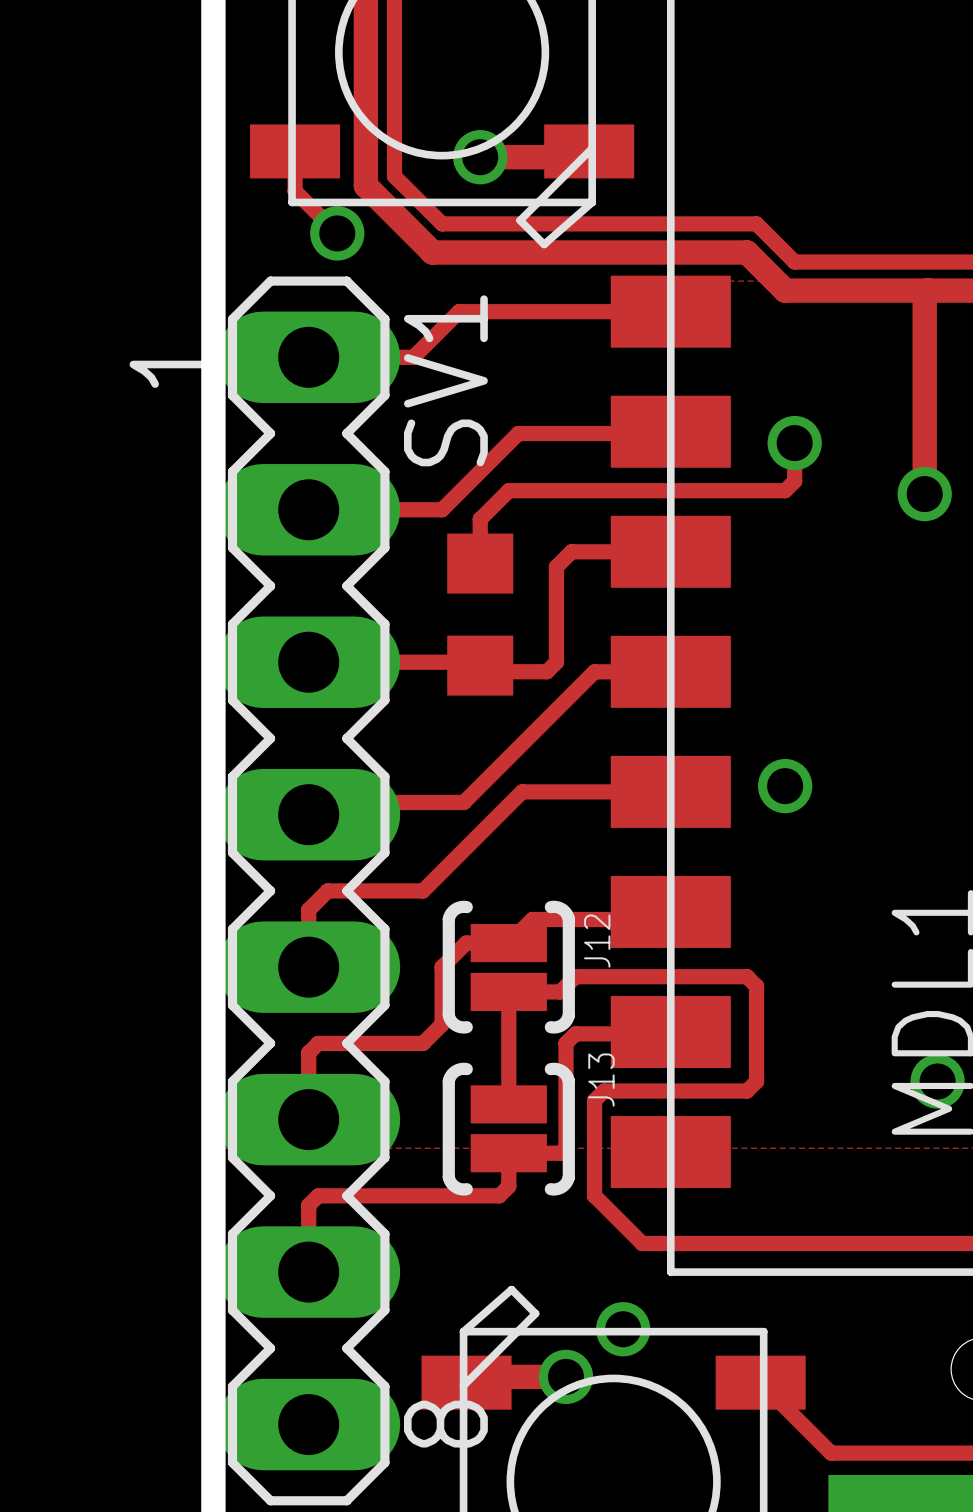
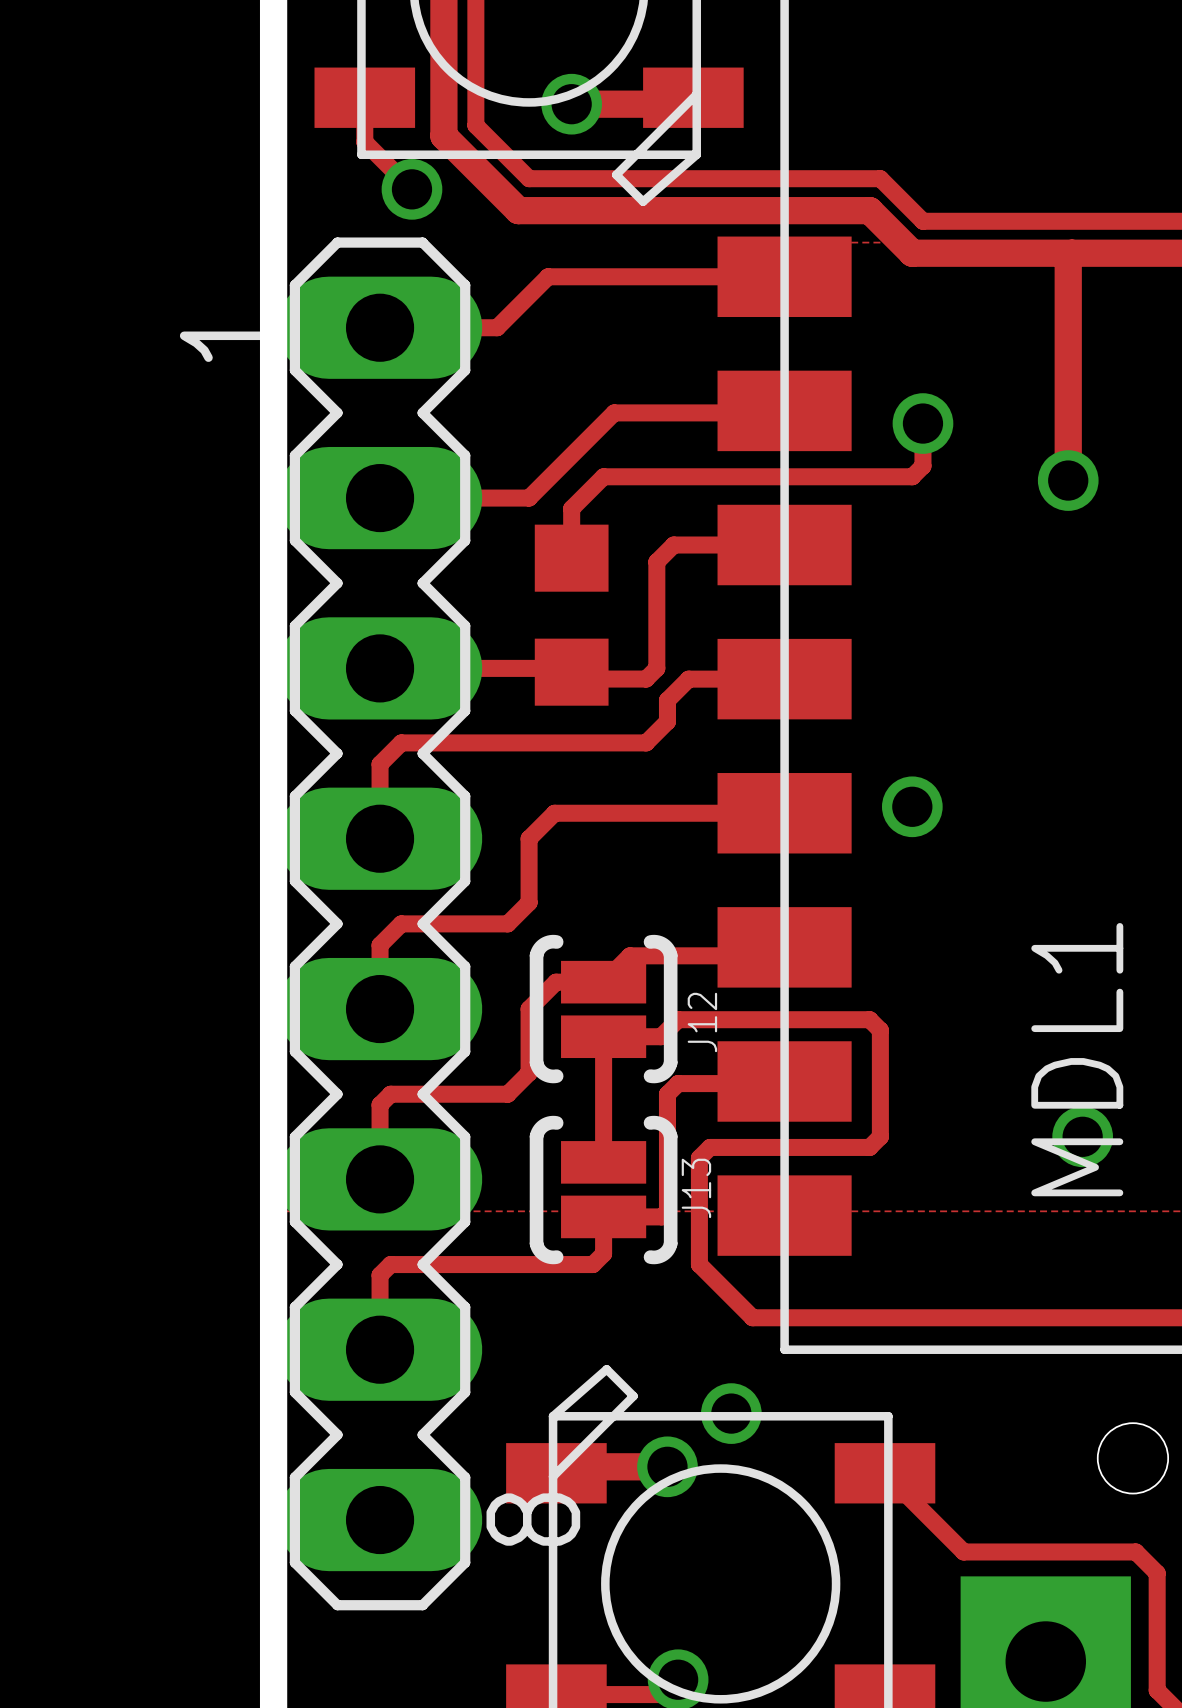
SV1 name: SV1 (445, 380) -> none
track: (594, 671) (463, 802) (309, 802) -> (699, 679) (688, 679) (667, 700) (667, 721) (646, 742) (401, 742) (380, 764) (380, 838)
track: (522, 791) (442, 871) -> (618, 813) (554, 813) (529, 838) (529, 902)
J12 name position: J12 (597, 941) -> J12 (702, 1022)
J13 name position: J13 (601, 1080) -> J13 (696, 1188)

